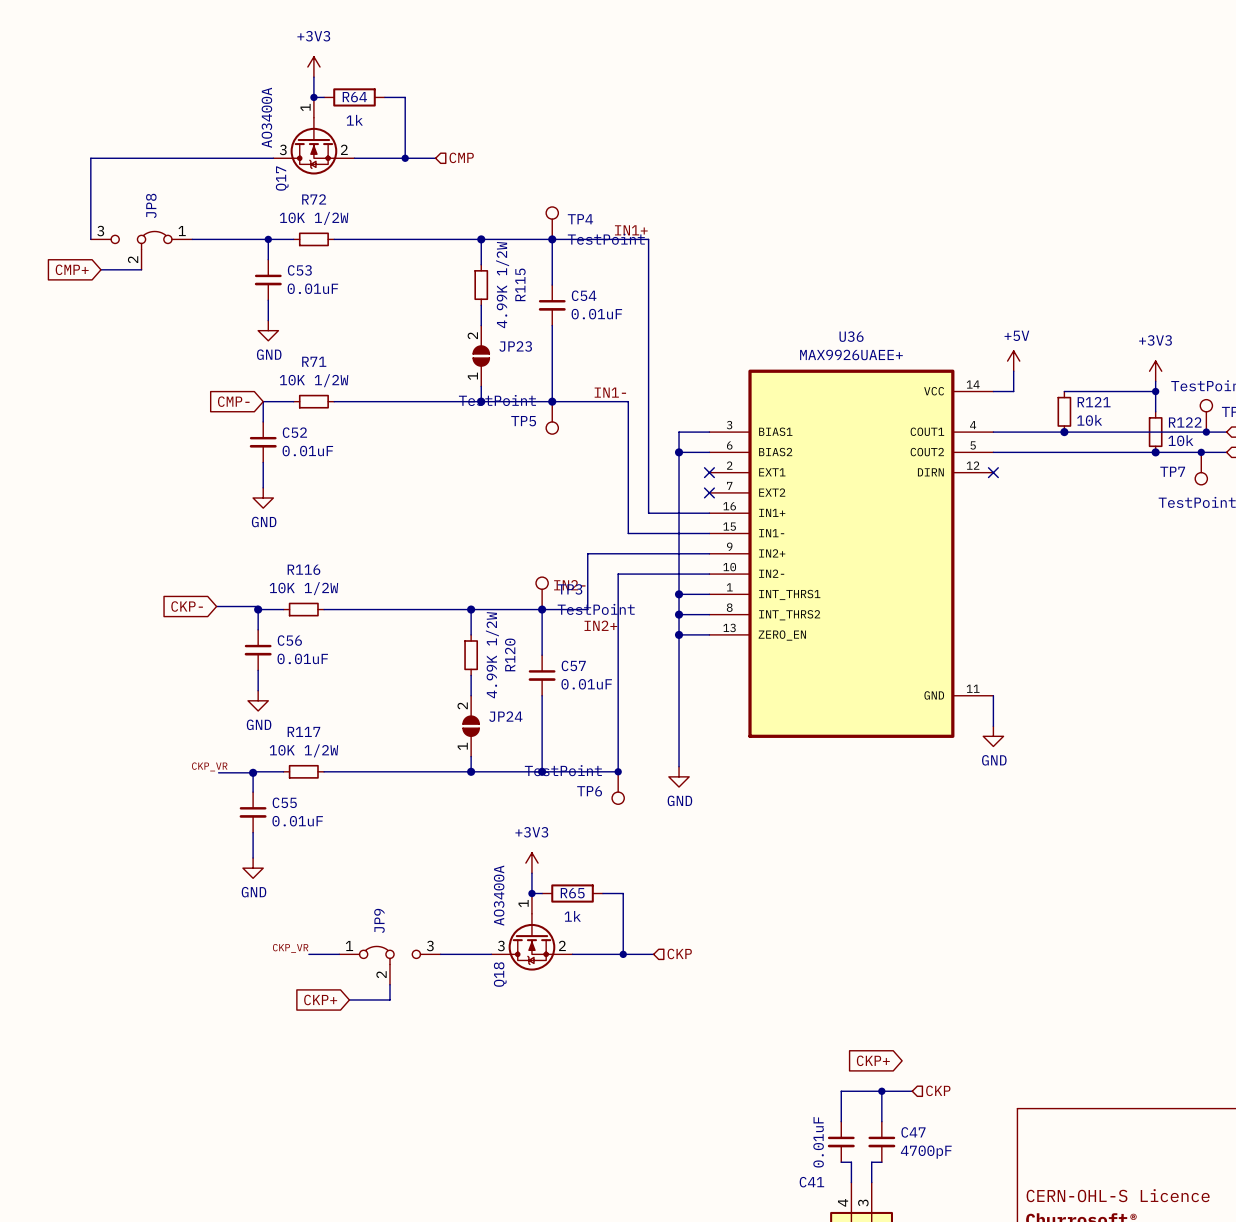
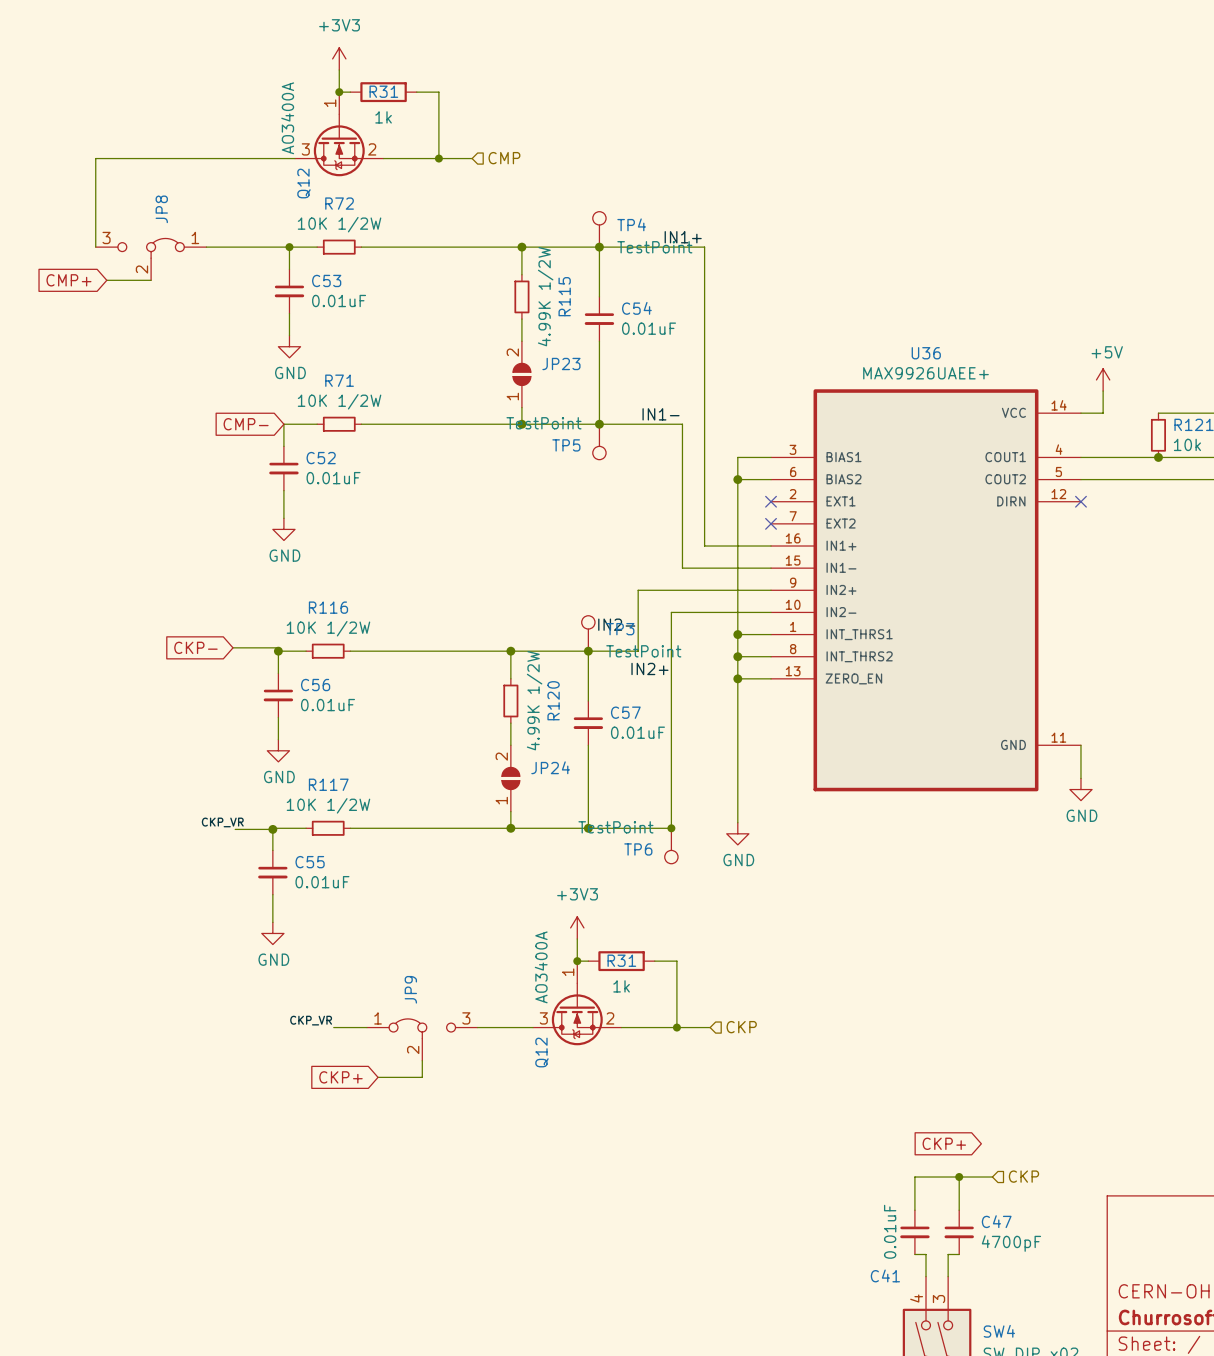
R64 name: R64 (354, 97) -> R31 (383, 91)
Q17 name: Q17 (282, 178) -> Q12 (303, 183)
R65 name: R65 (572, 893) -> R31 (621, 960)
Q18 name: Q18 (500, 974) -> Q12 (541, 1052)

